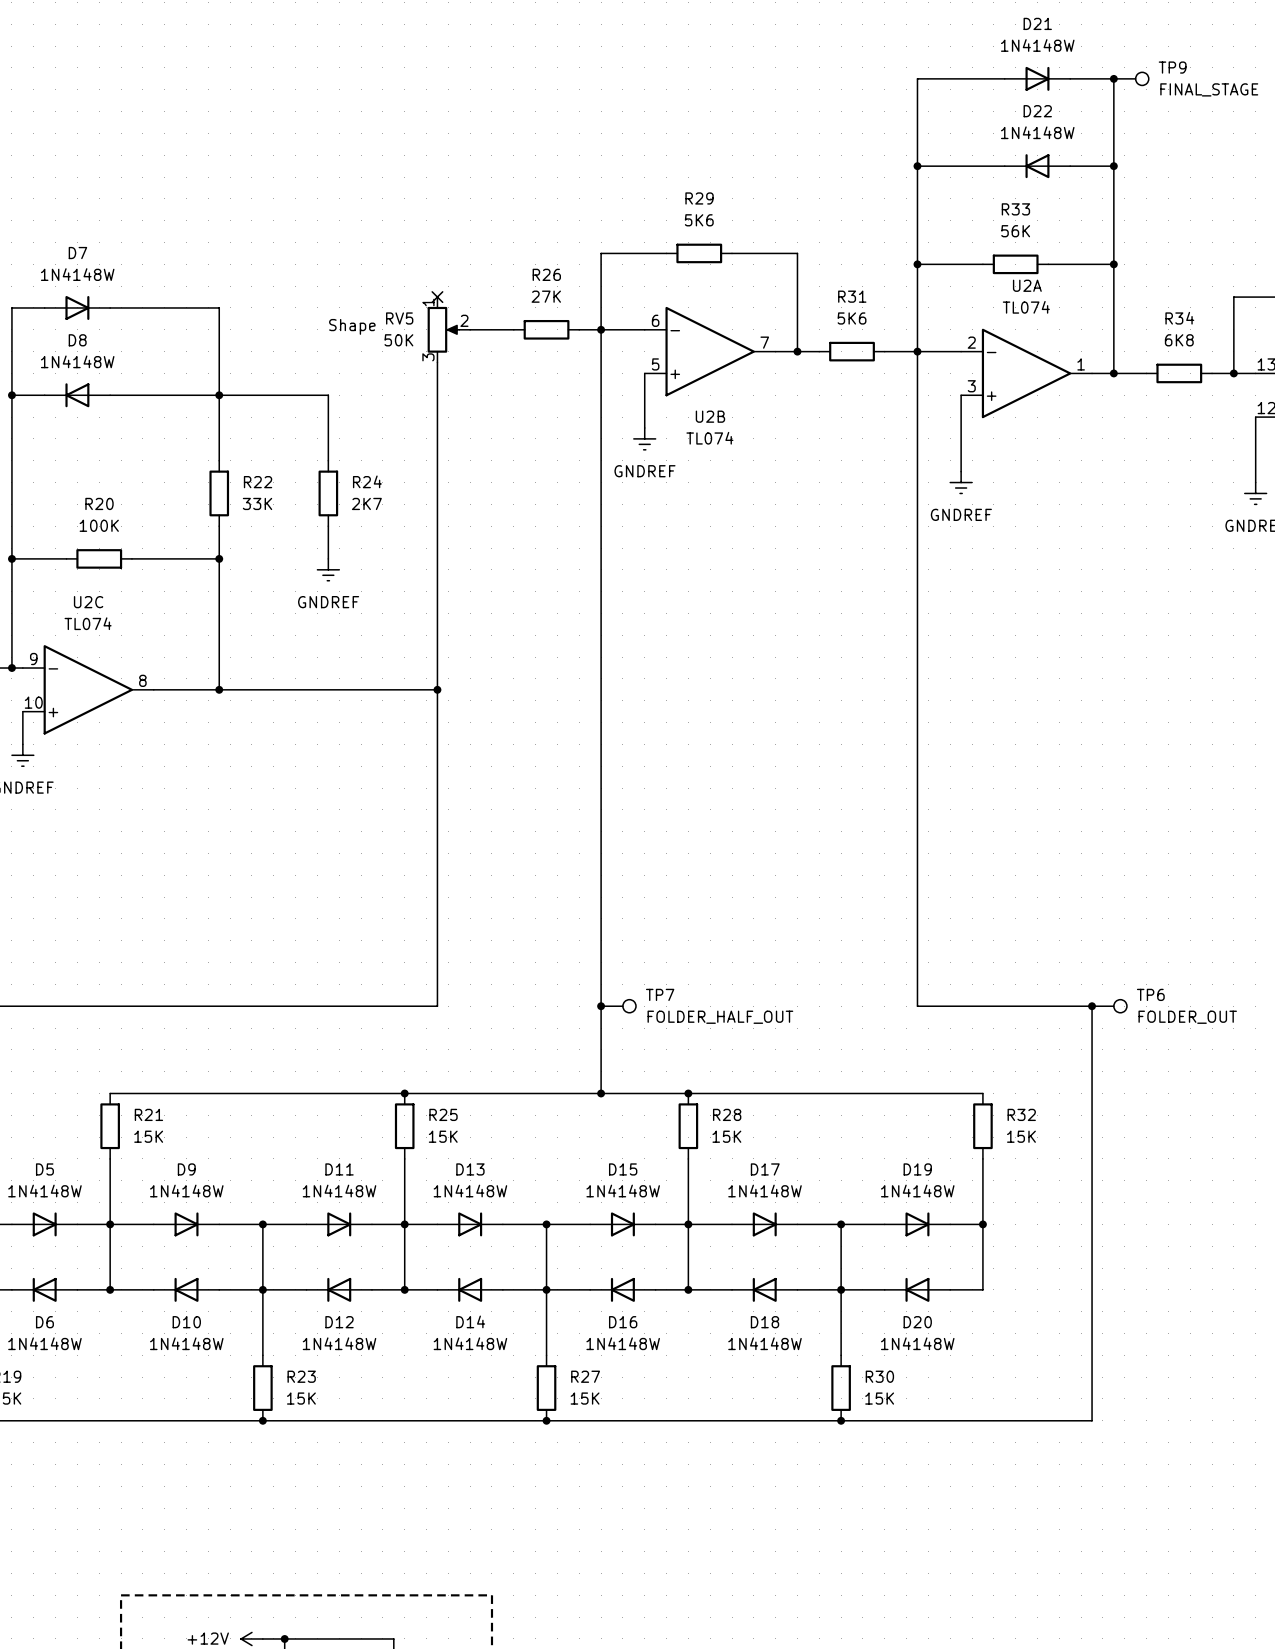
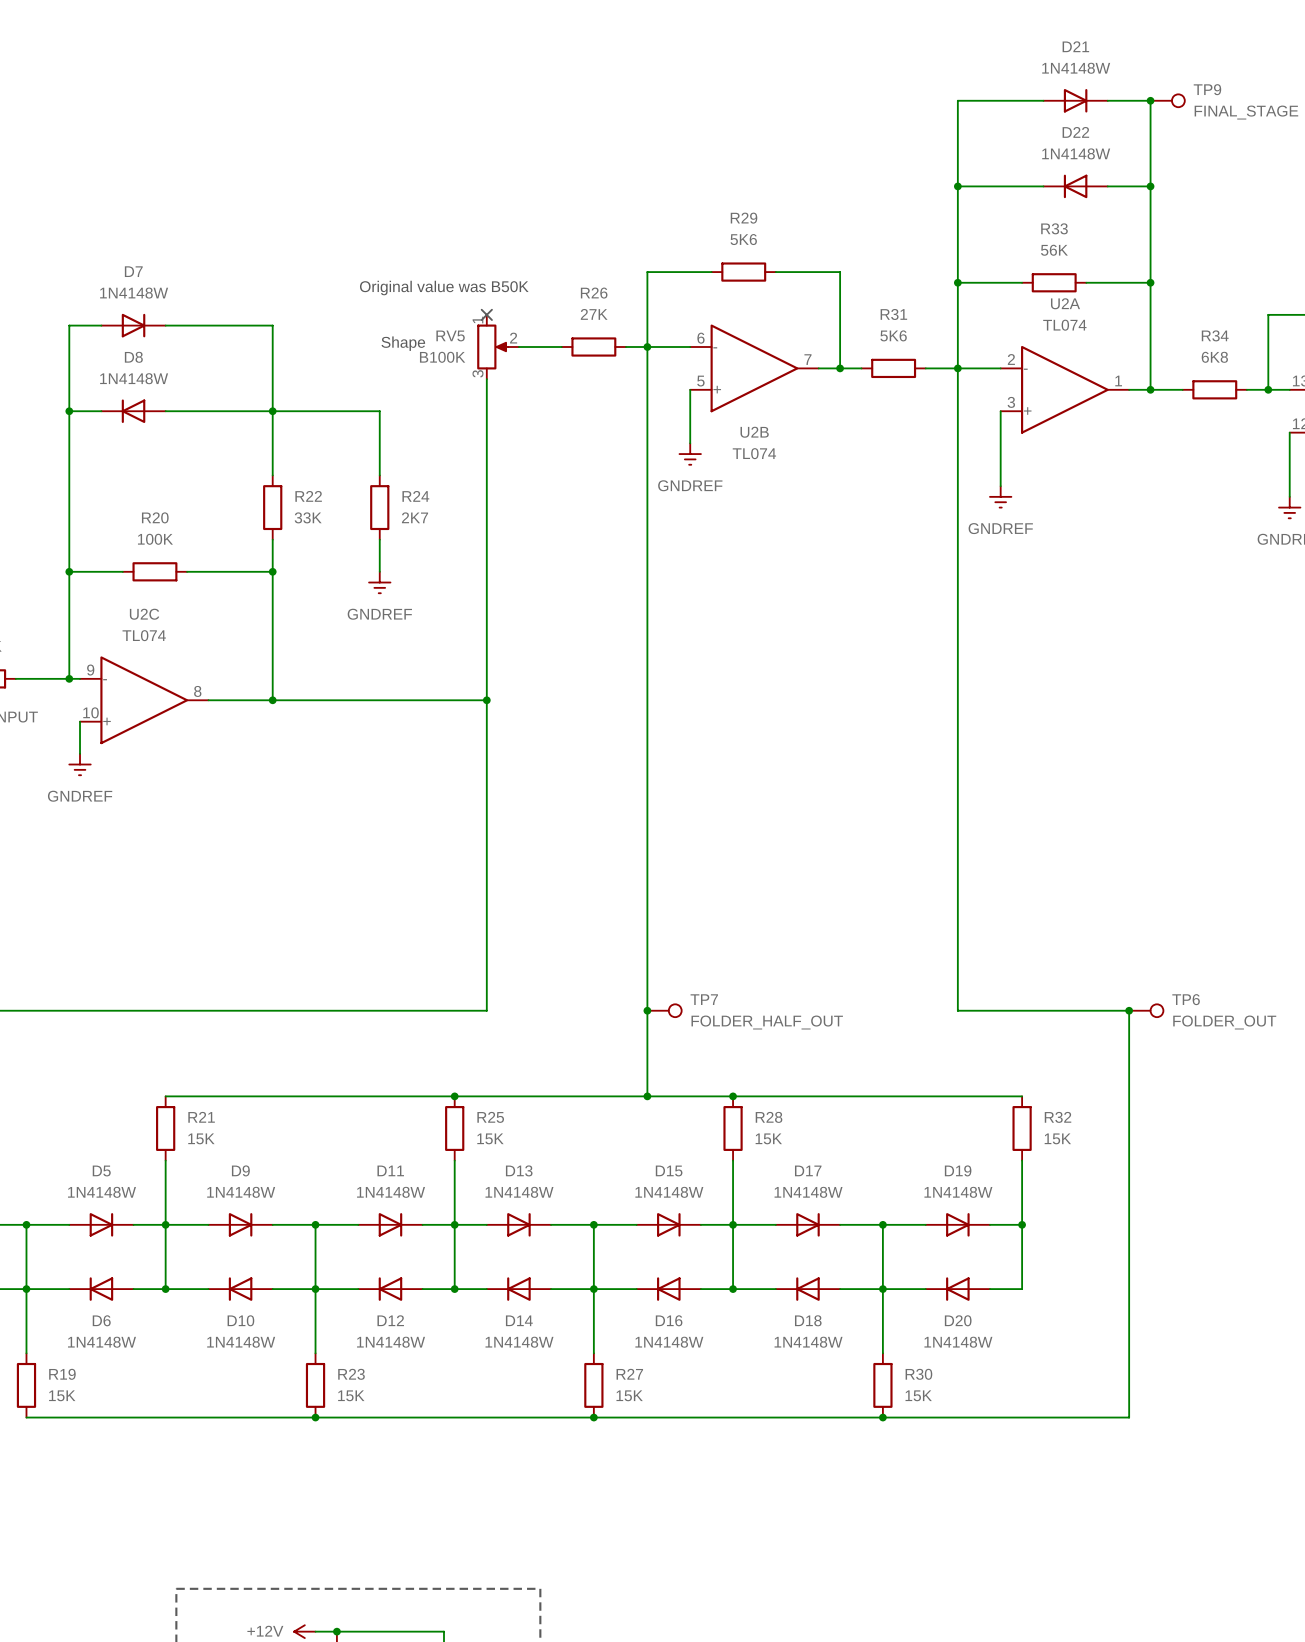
text: none -> Original value was B50K (444, 288)
RV5 value: 50K (398, 340) -> B100K (442, 357)

